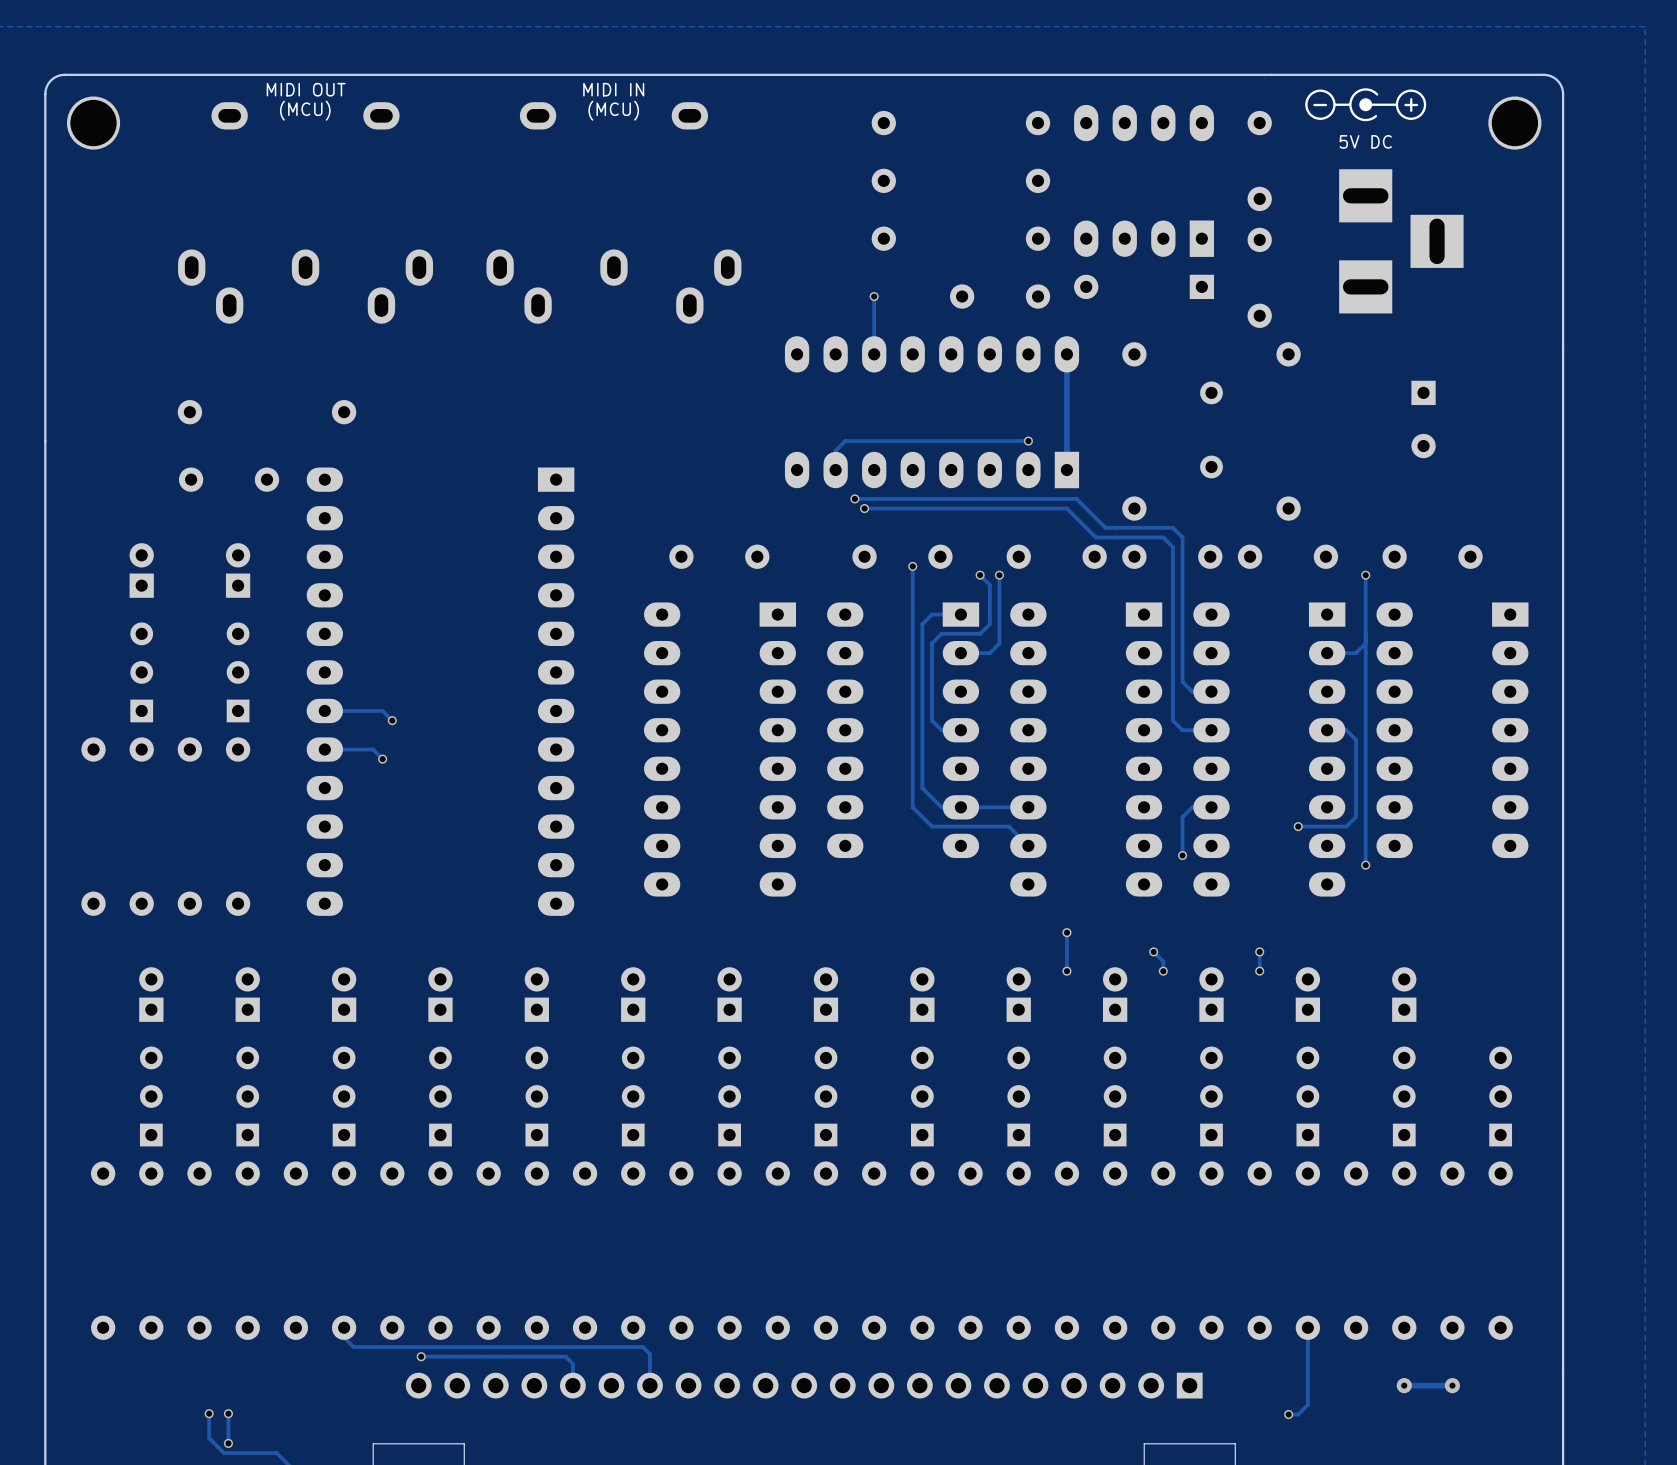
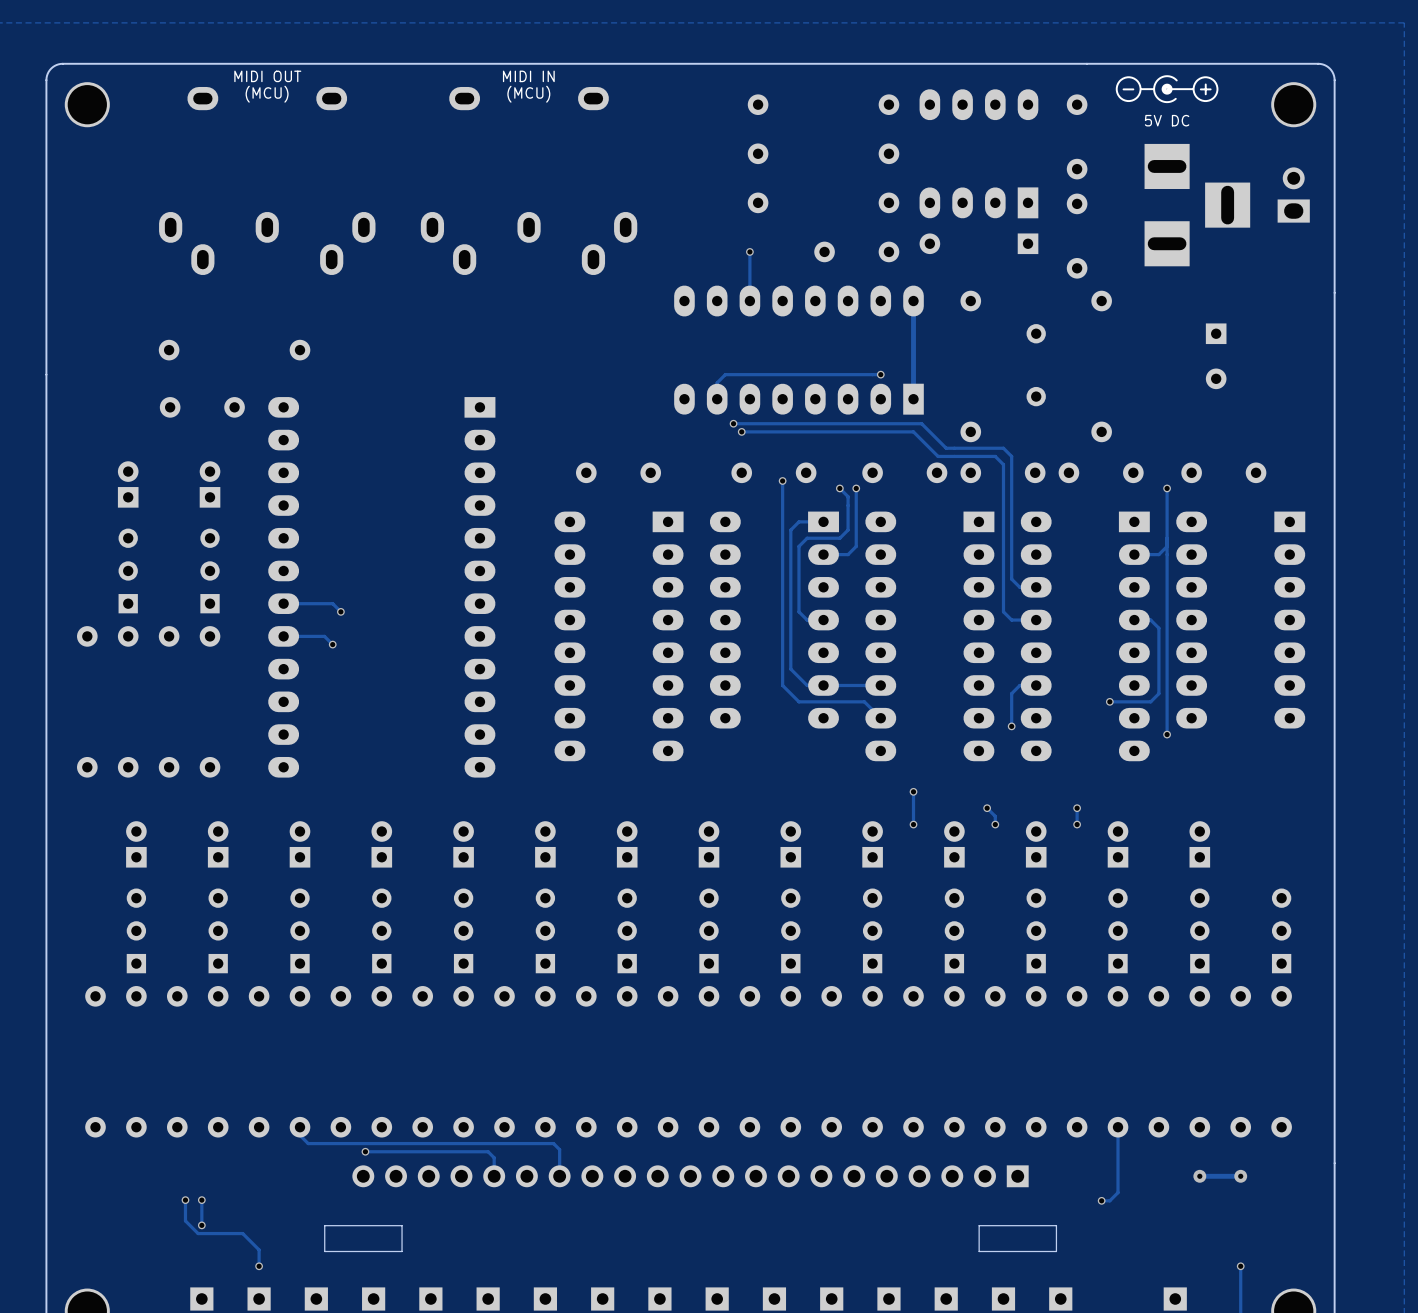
part: none -> (1293, 195)

